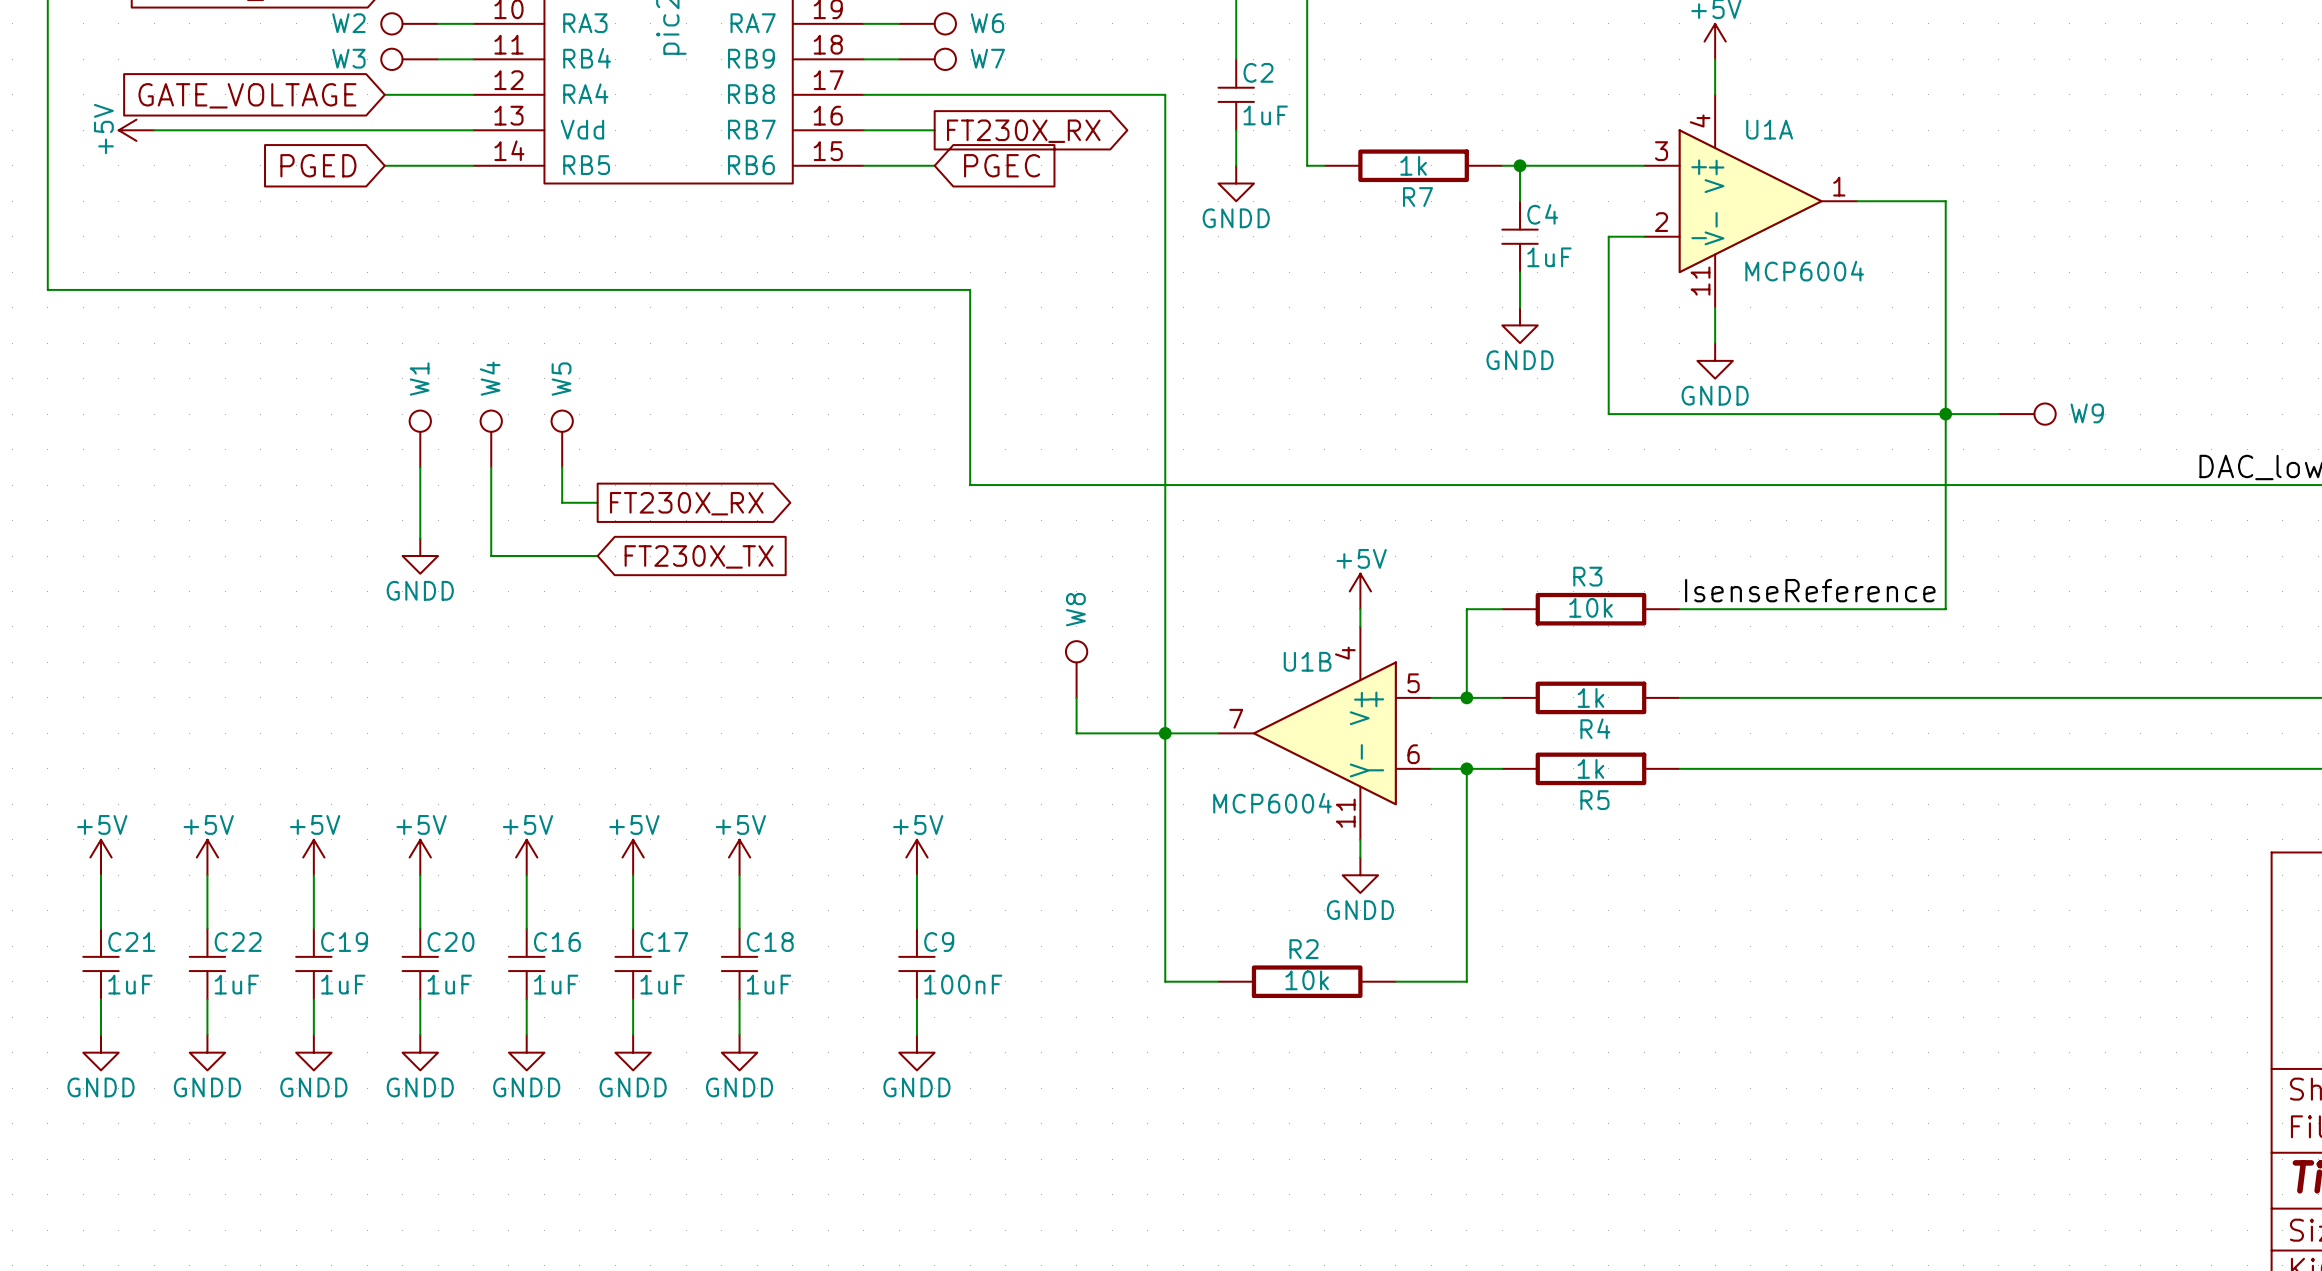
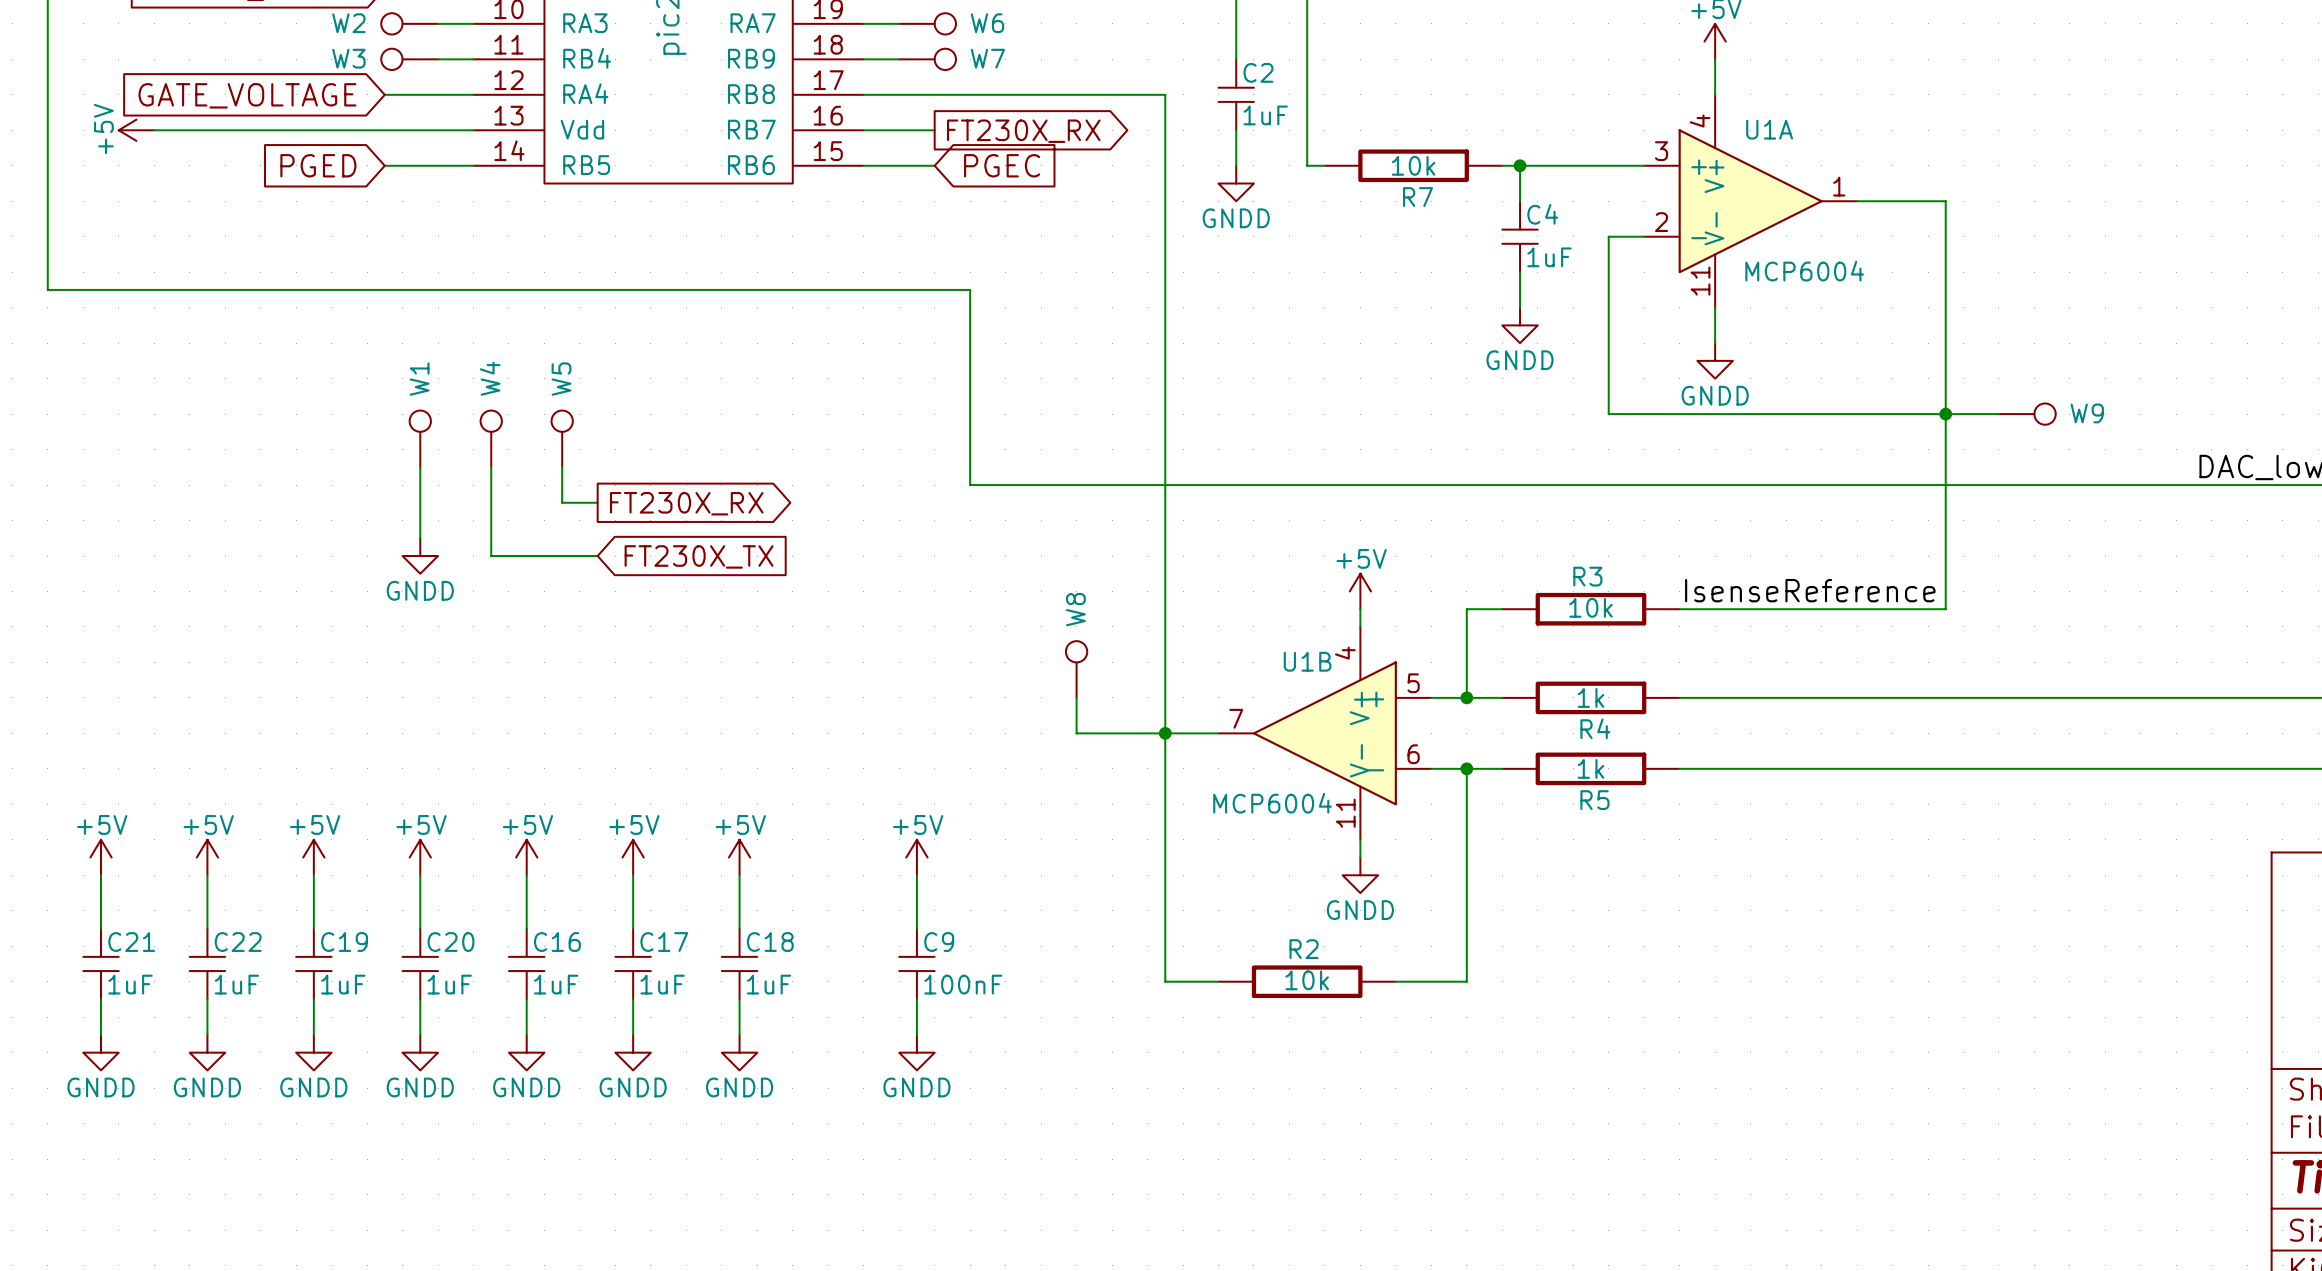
R7 value: 1k (1413, 165) -> 10k (1413, 165)

